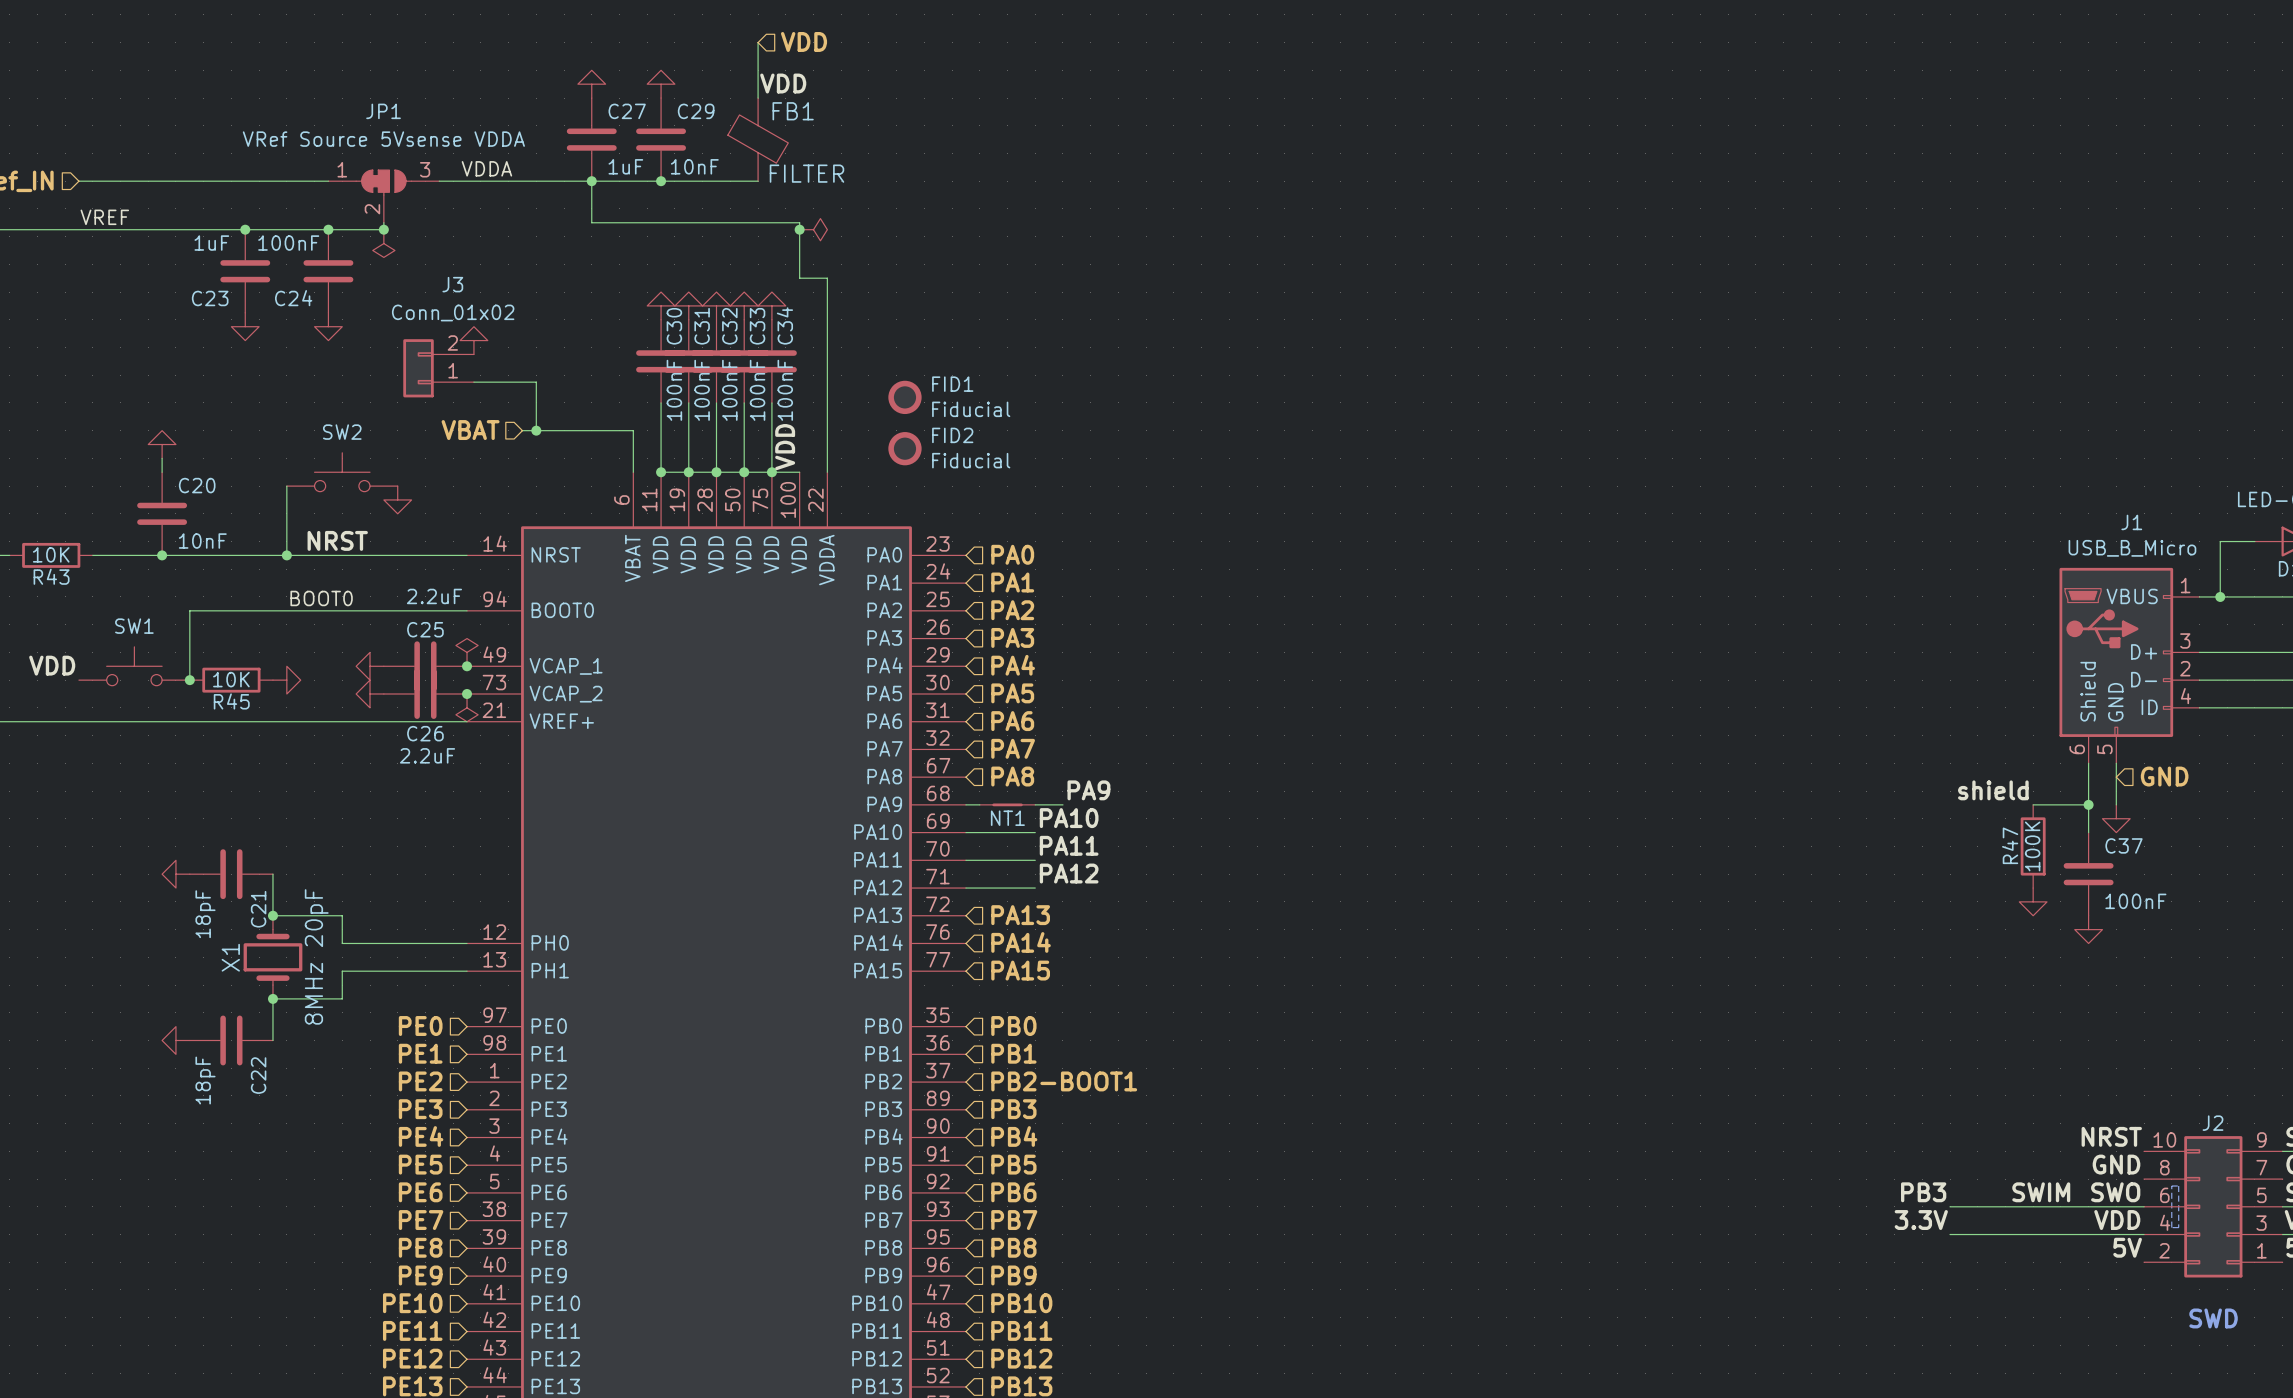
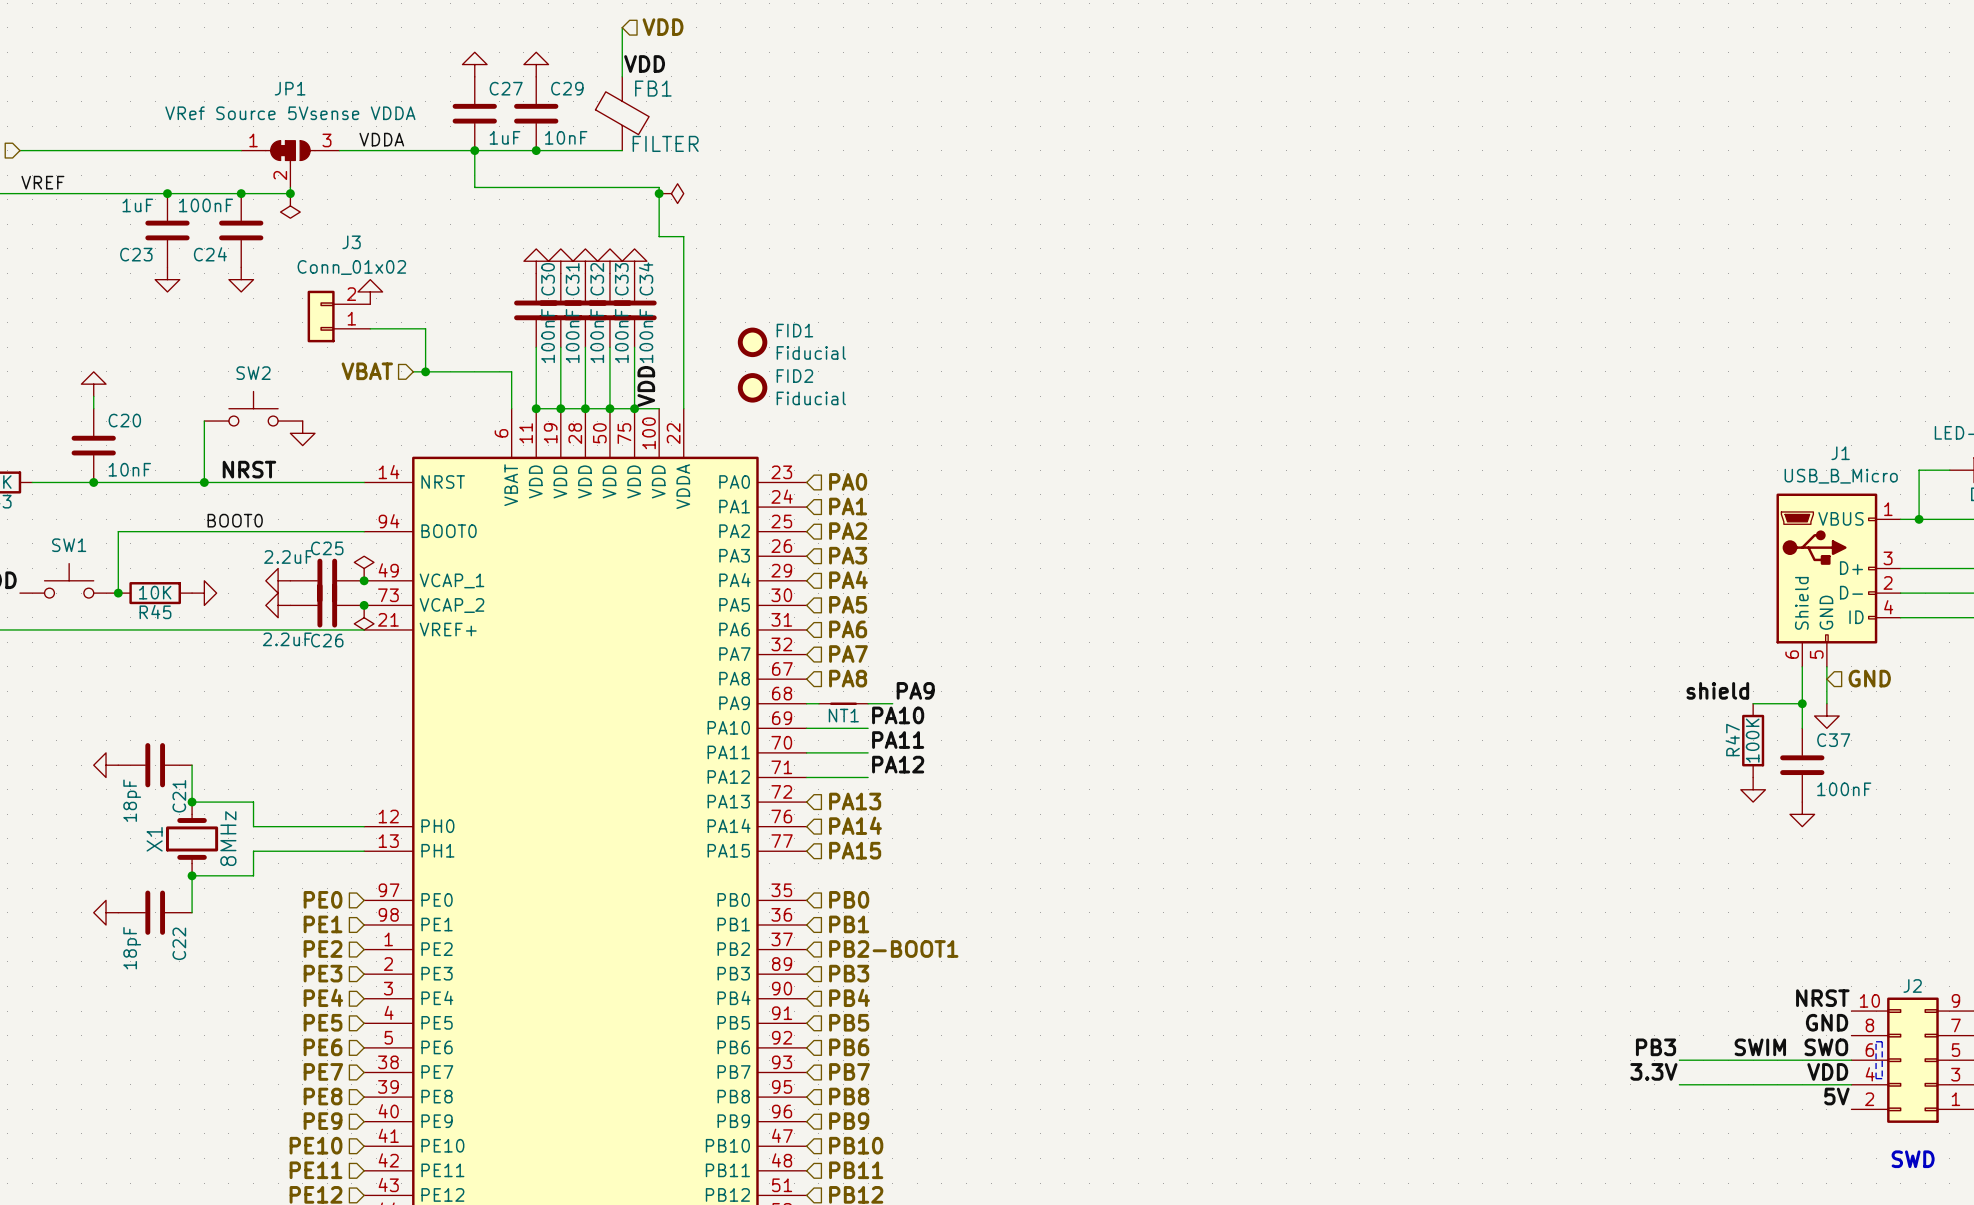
C25 value position: 2.2uF (434, 596) -> 2.2uF (288, 557)
C26 value position: 2.2uF (427, 755) -> 2.2uF (287, 639)
X1 value: 8MHz 20pF (316, 956) -> 8MHz (228, 838)

